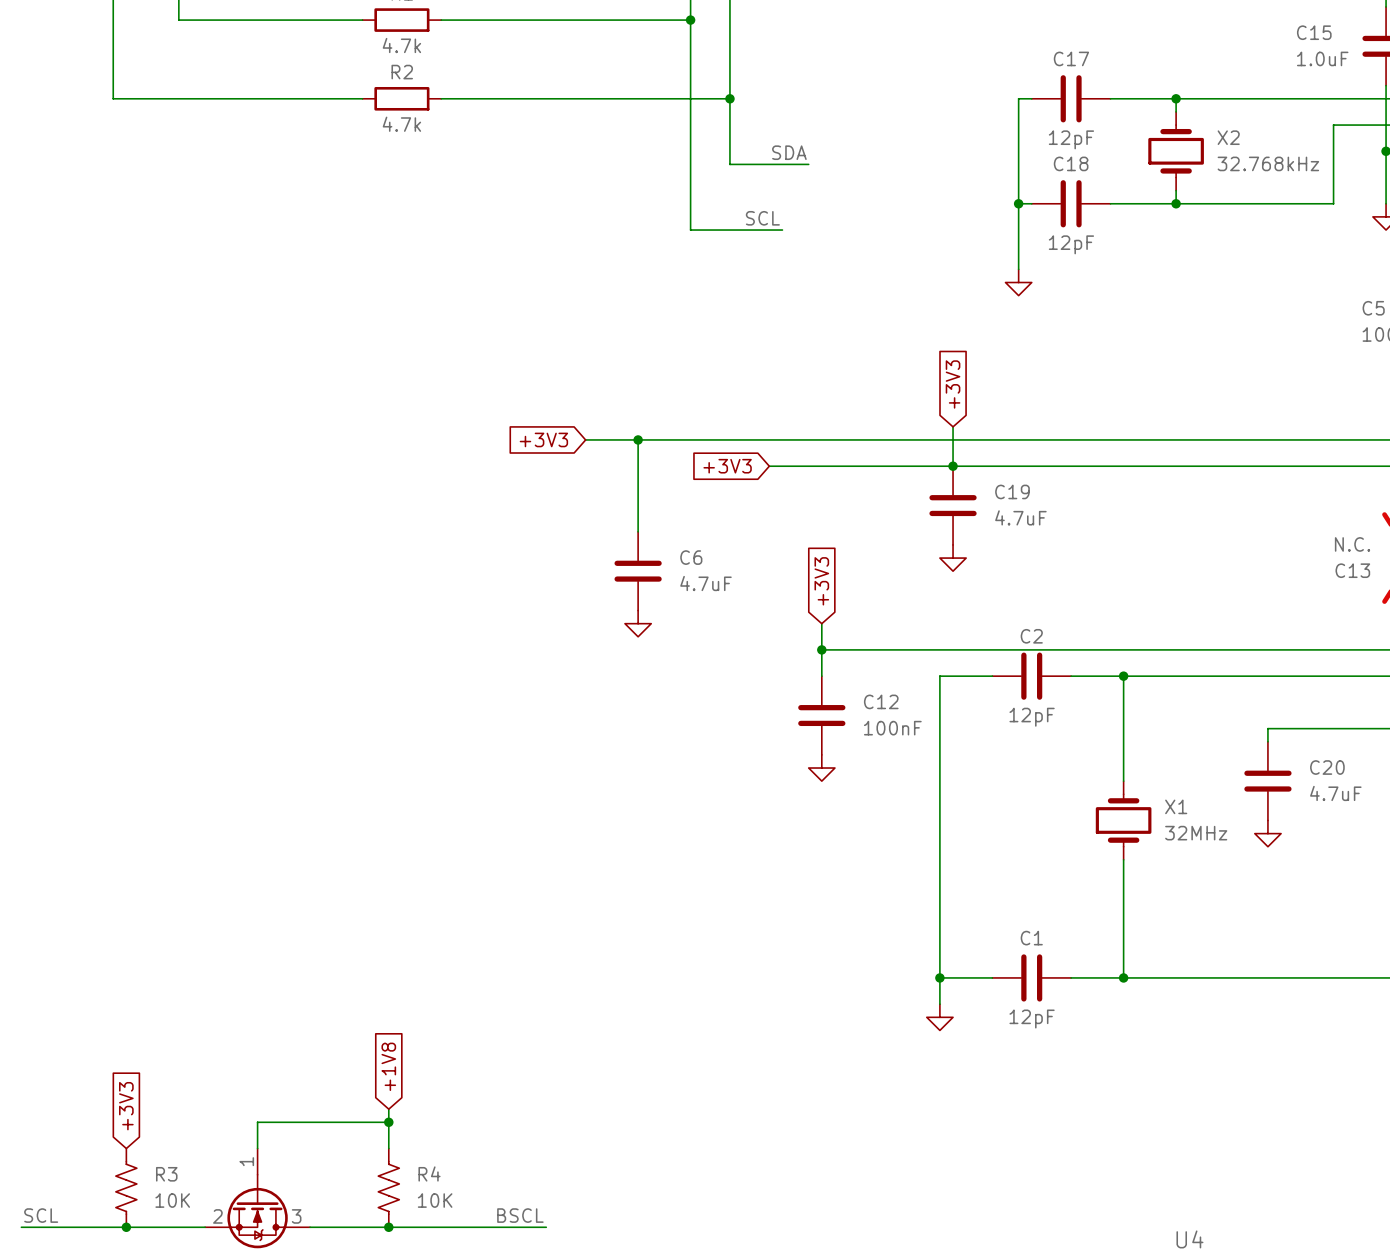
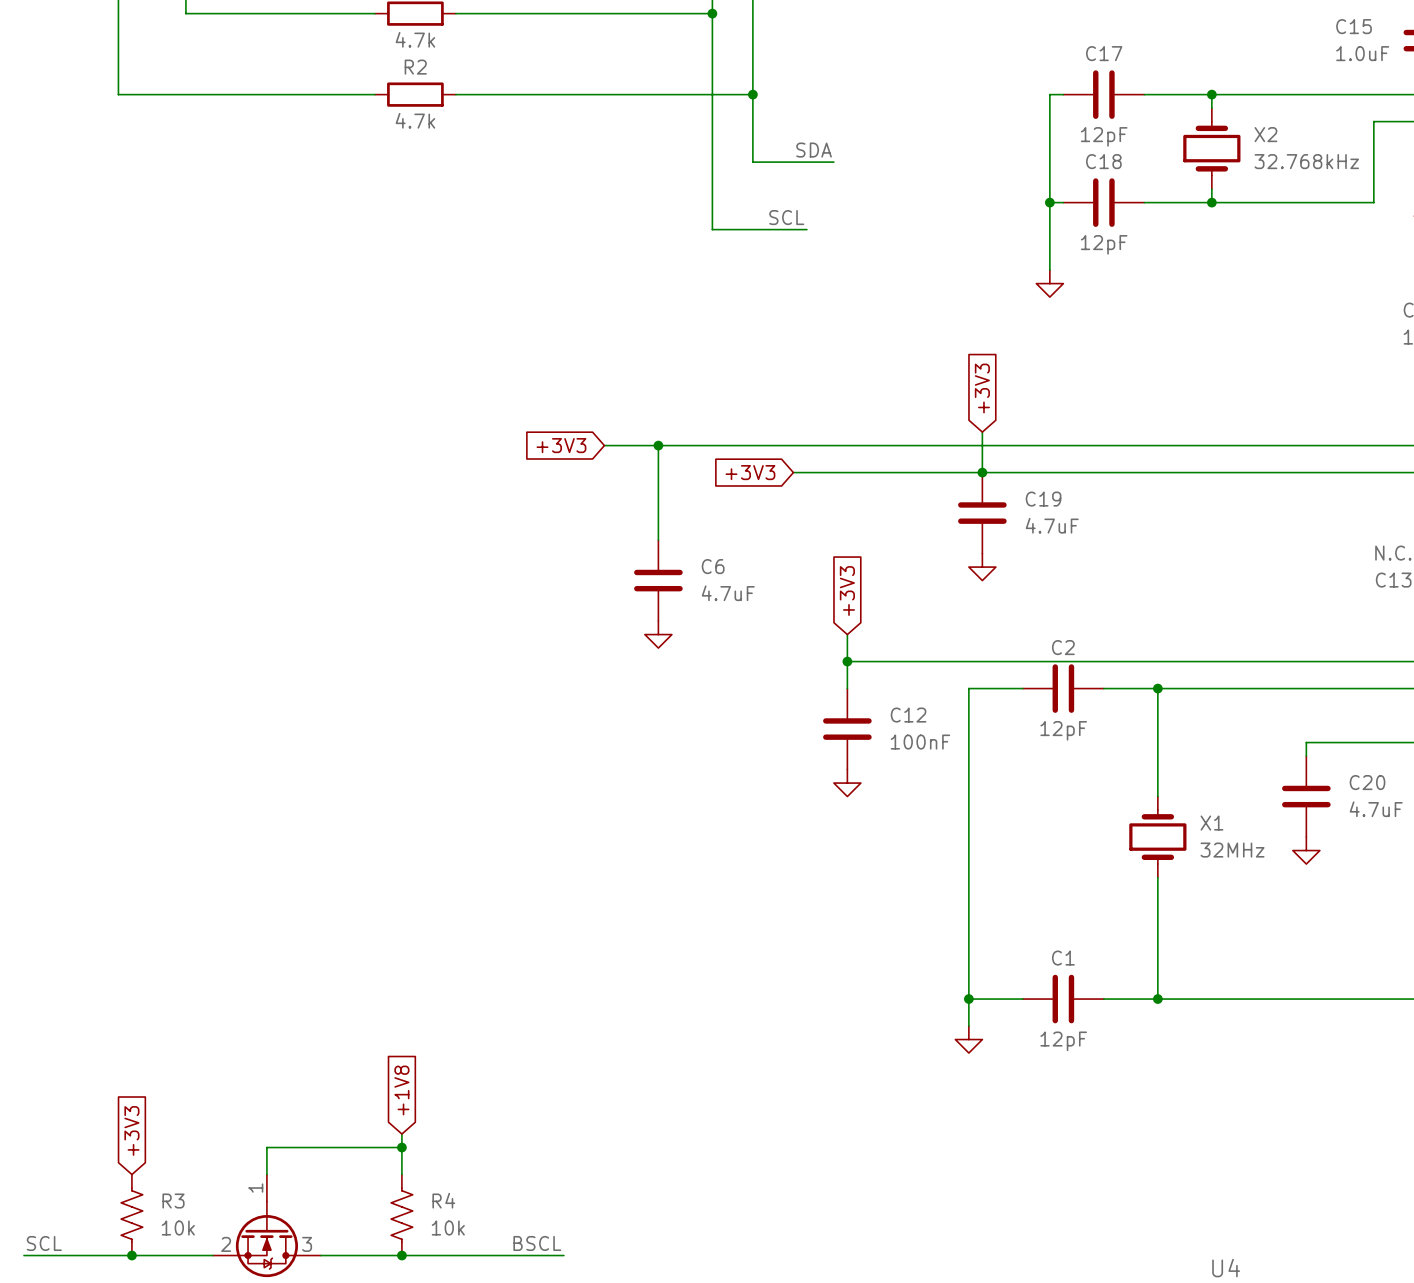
R3 value: 10K (172, 1200) -> 10k (178, 1228)
R4 value: 10K (435, 1200) -> 10k (448, 1228)

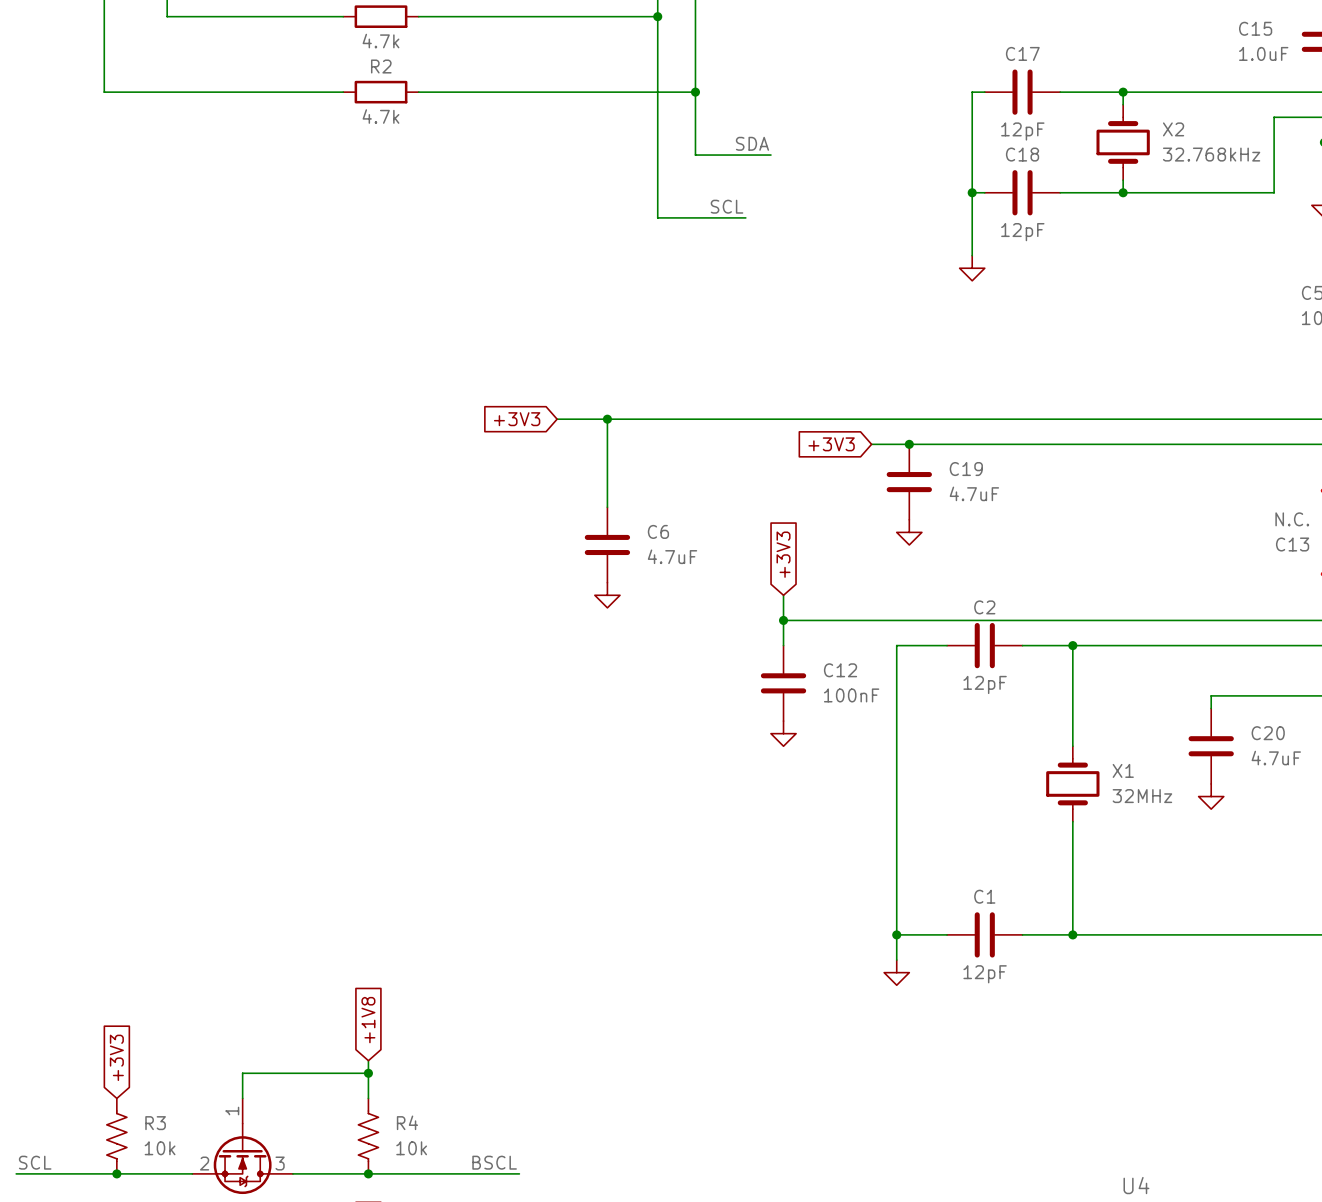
global label rotation: 0° (982, 388) -> 90° counterclockwise (831, 444)
global label position: +3V3 (982, 388) -> +3V3 (831, 444)
wire: (982, 432) (982, 472) -> none
global label: +3V3 (750, 472) -> none
wire: (793, 472) (941, 472) -> none

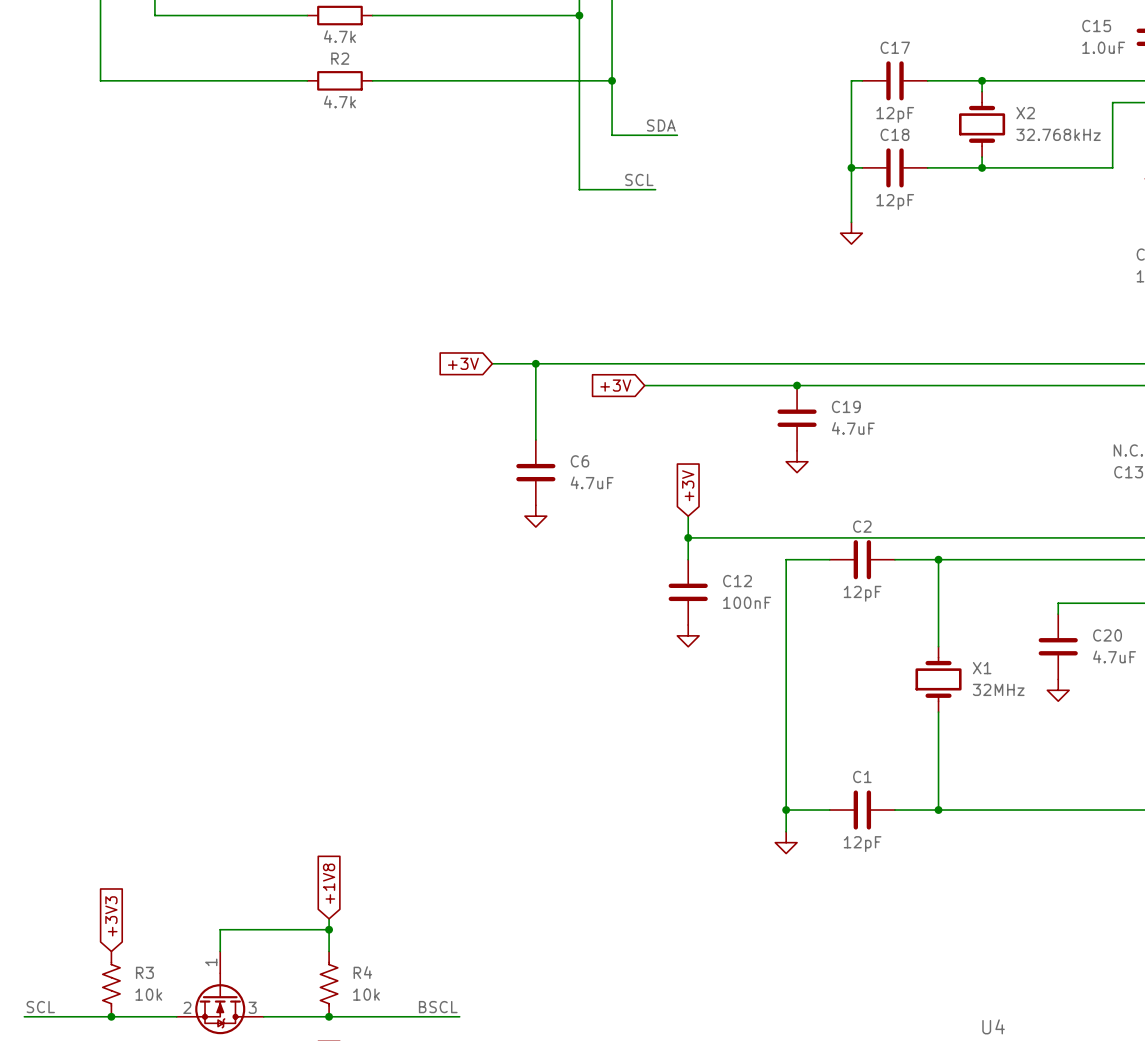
global label: +3V3 (517, 419) -> +3V (463, 363)
global label: none -> +3V (615, 385)
wire: none -> (644, 385) (764, 385)
global label: +3V3 (831, 444) -> none
global label: +3V3 (783, 554) -> +3V (688, 485)

